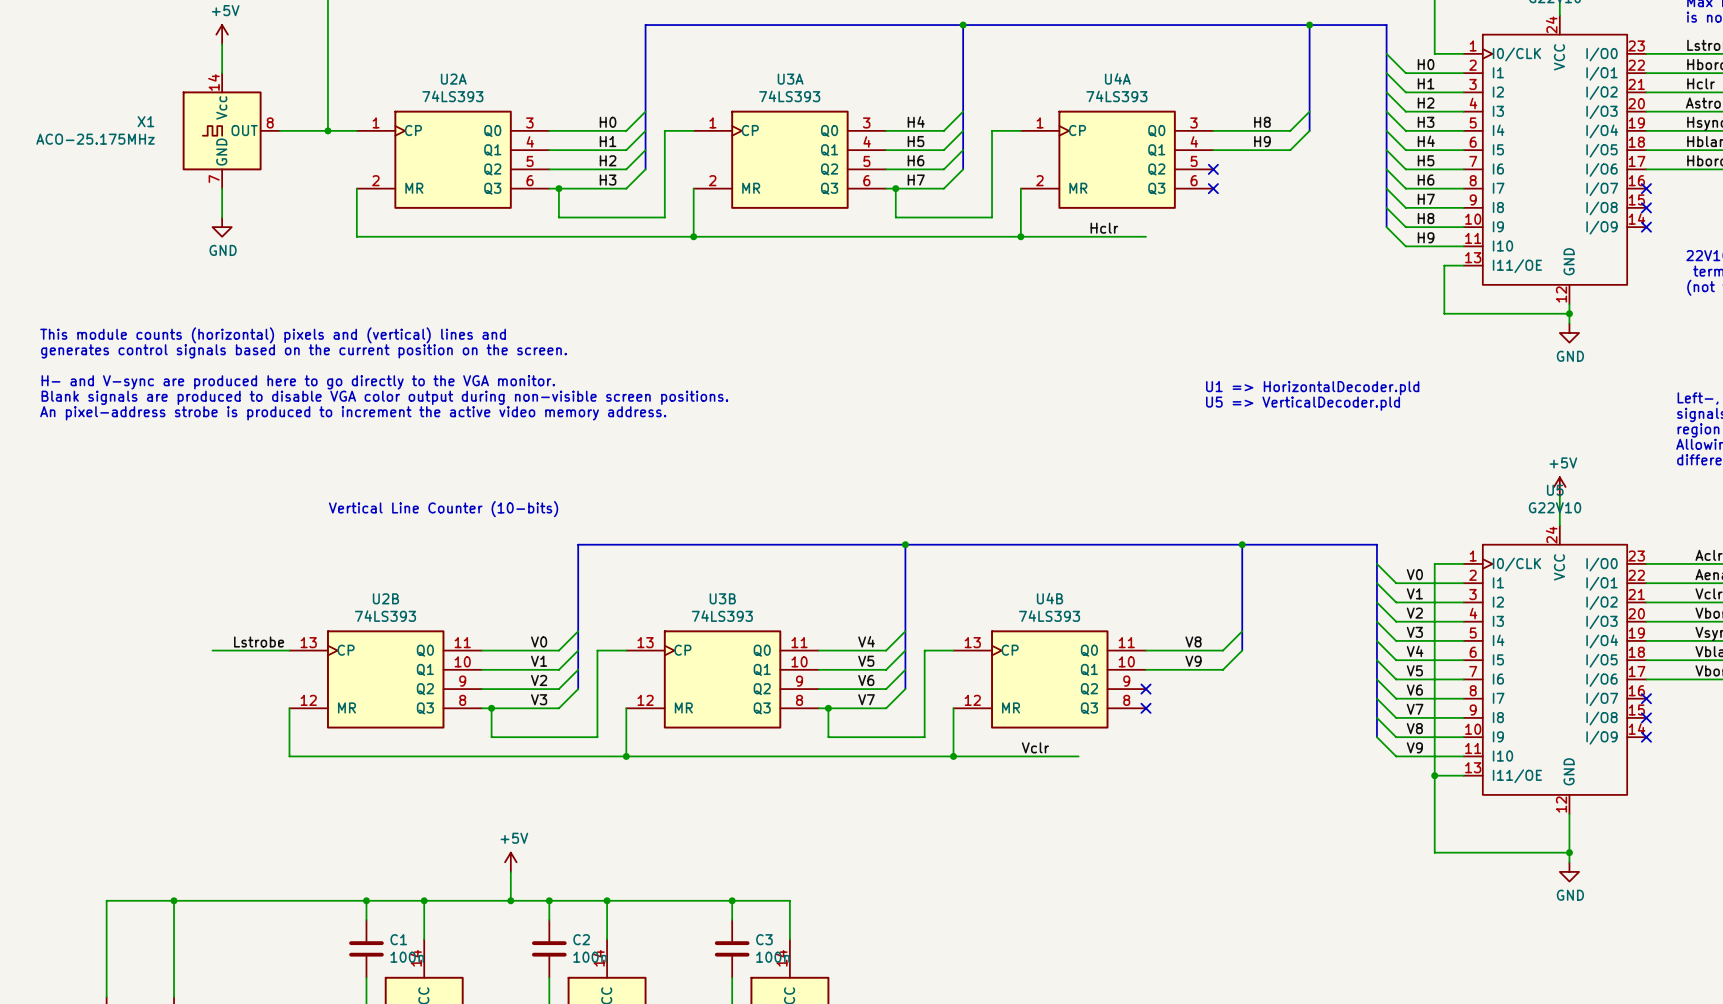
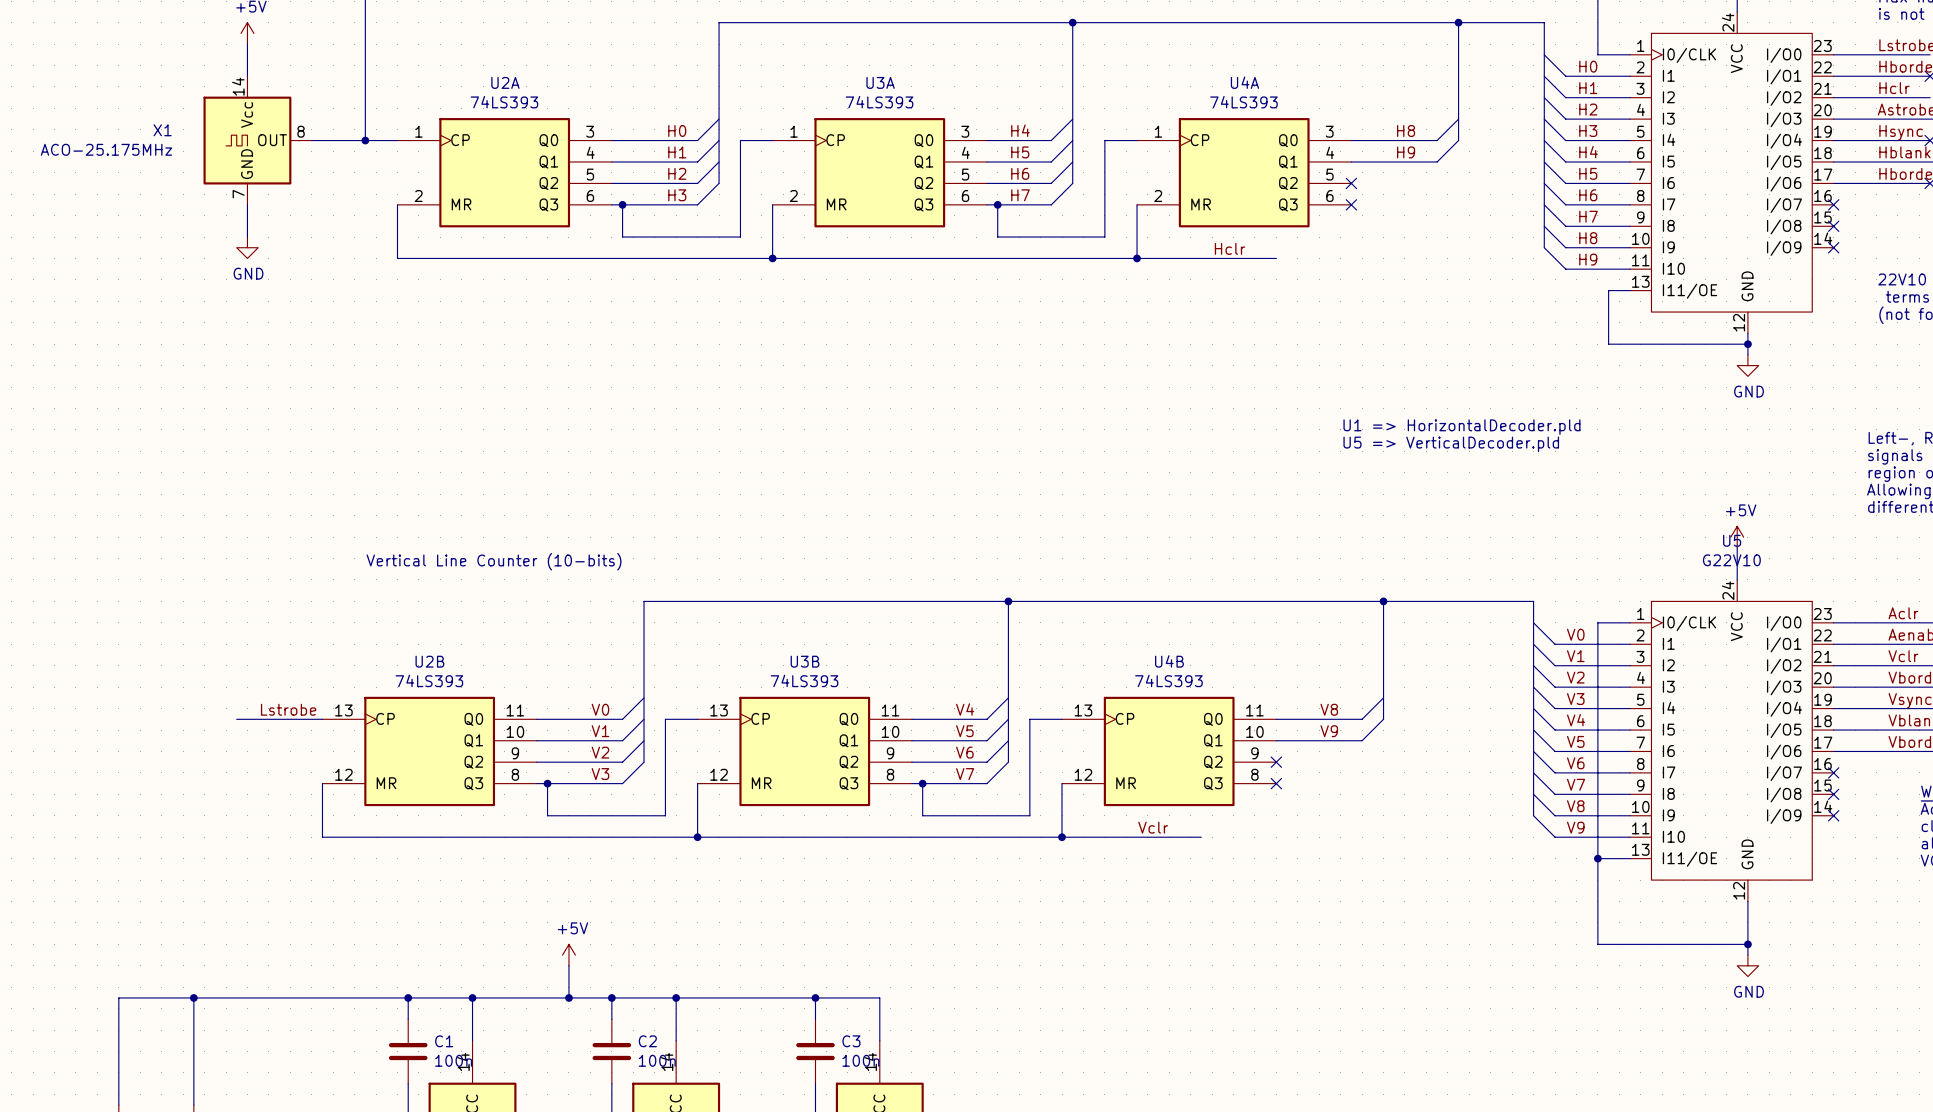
text: This module counts (horizontal) pixels and (vertical) lines and (273, 335) -> none
text: generates control signals based on the current position on the screen. (303, 351) -> none
text: H- and V-sync are produced here to go directly to the VGA monitor. (298, 382) -> none
text: Blank signals are produced to disable VGA color output during non-visible screen positions. (384, 397) -> none
text: An pixel-address strobe is produced to increment the active video memory address. (353, 413) -> none

